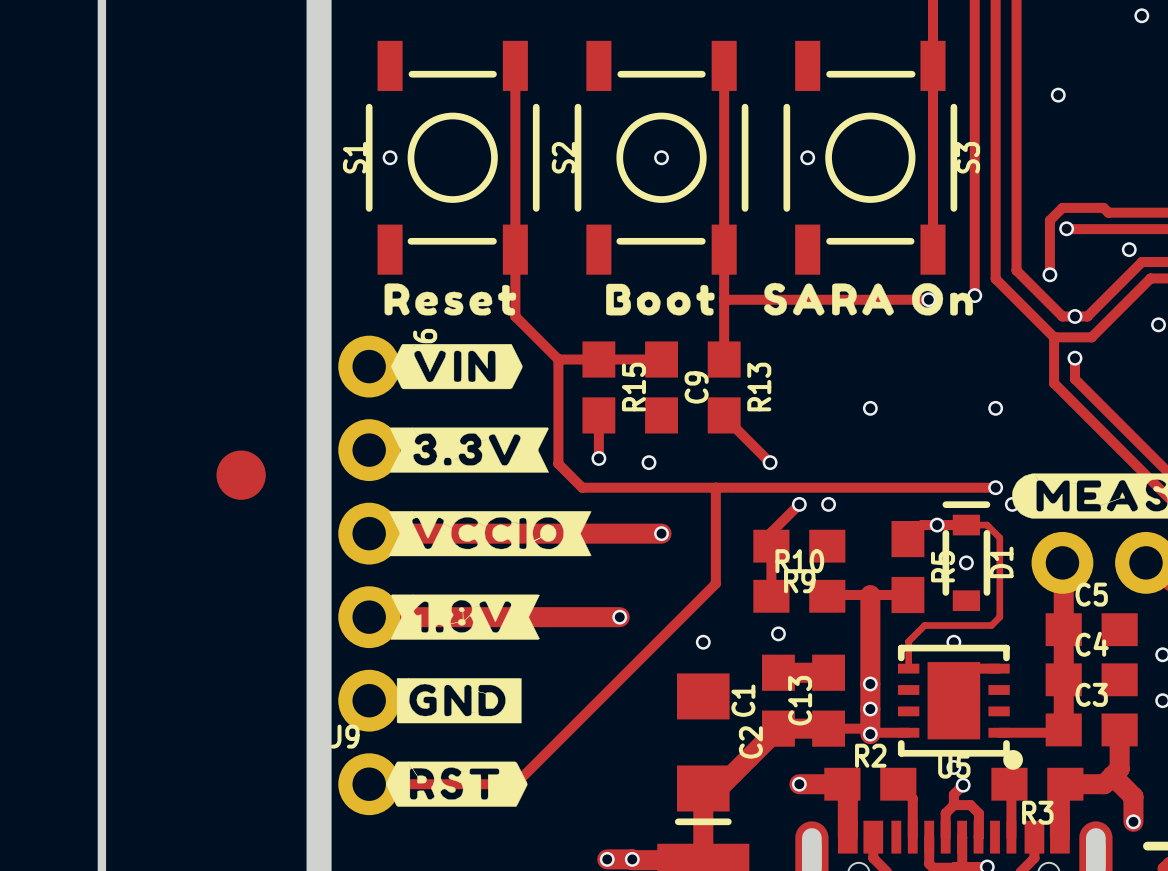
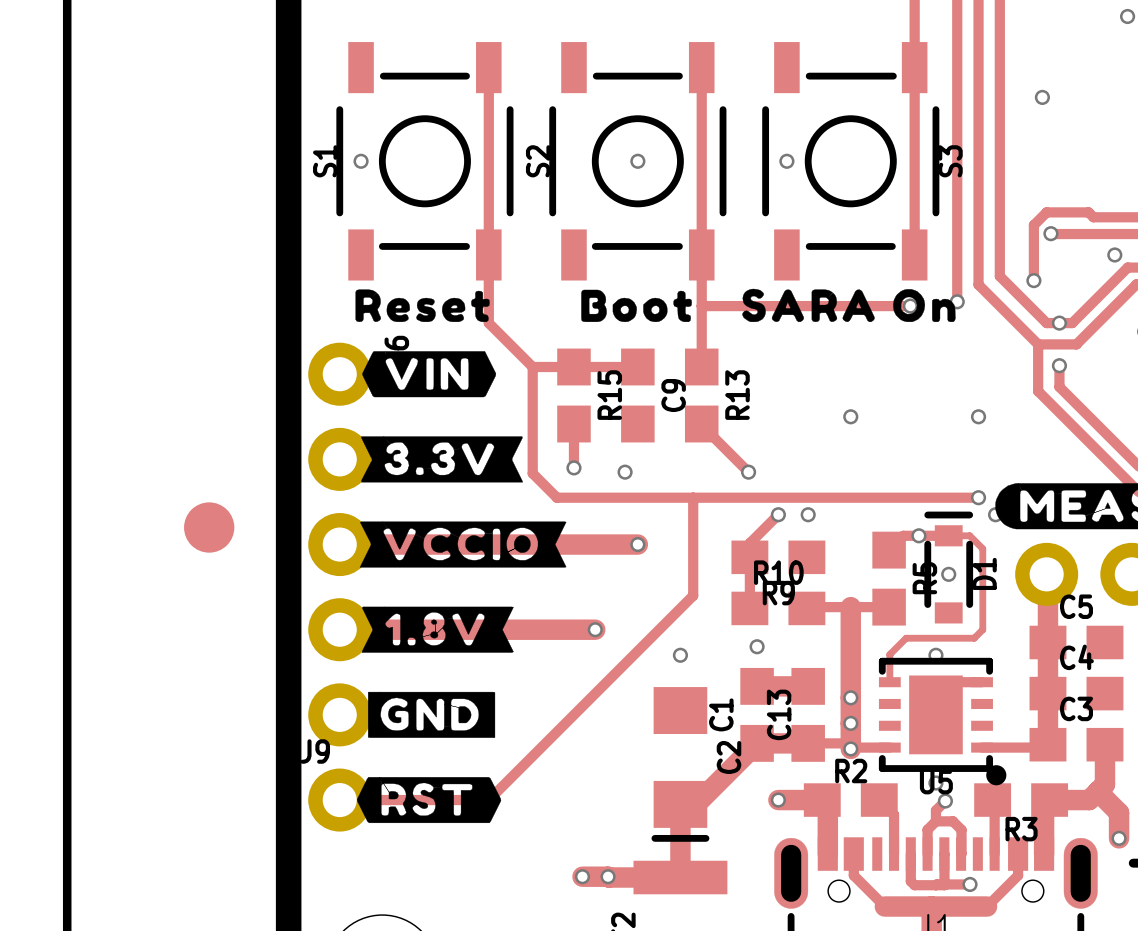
part position: (241, 475) -> (209, 527)

